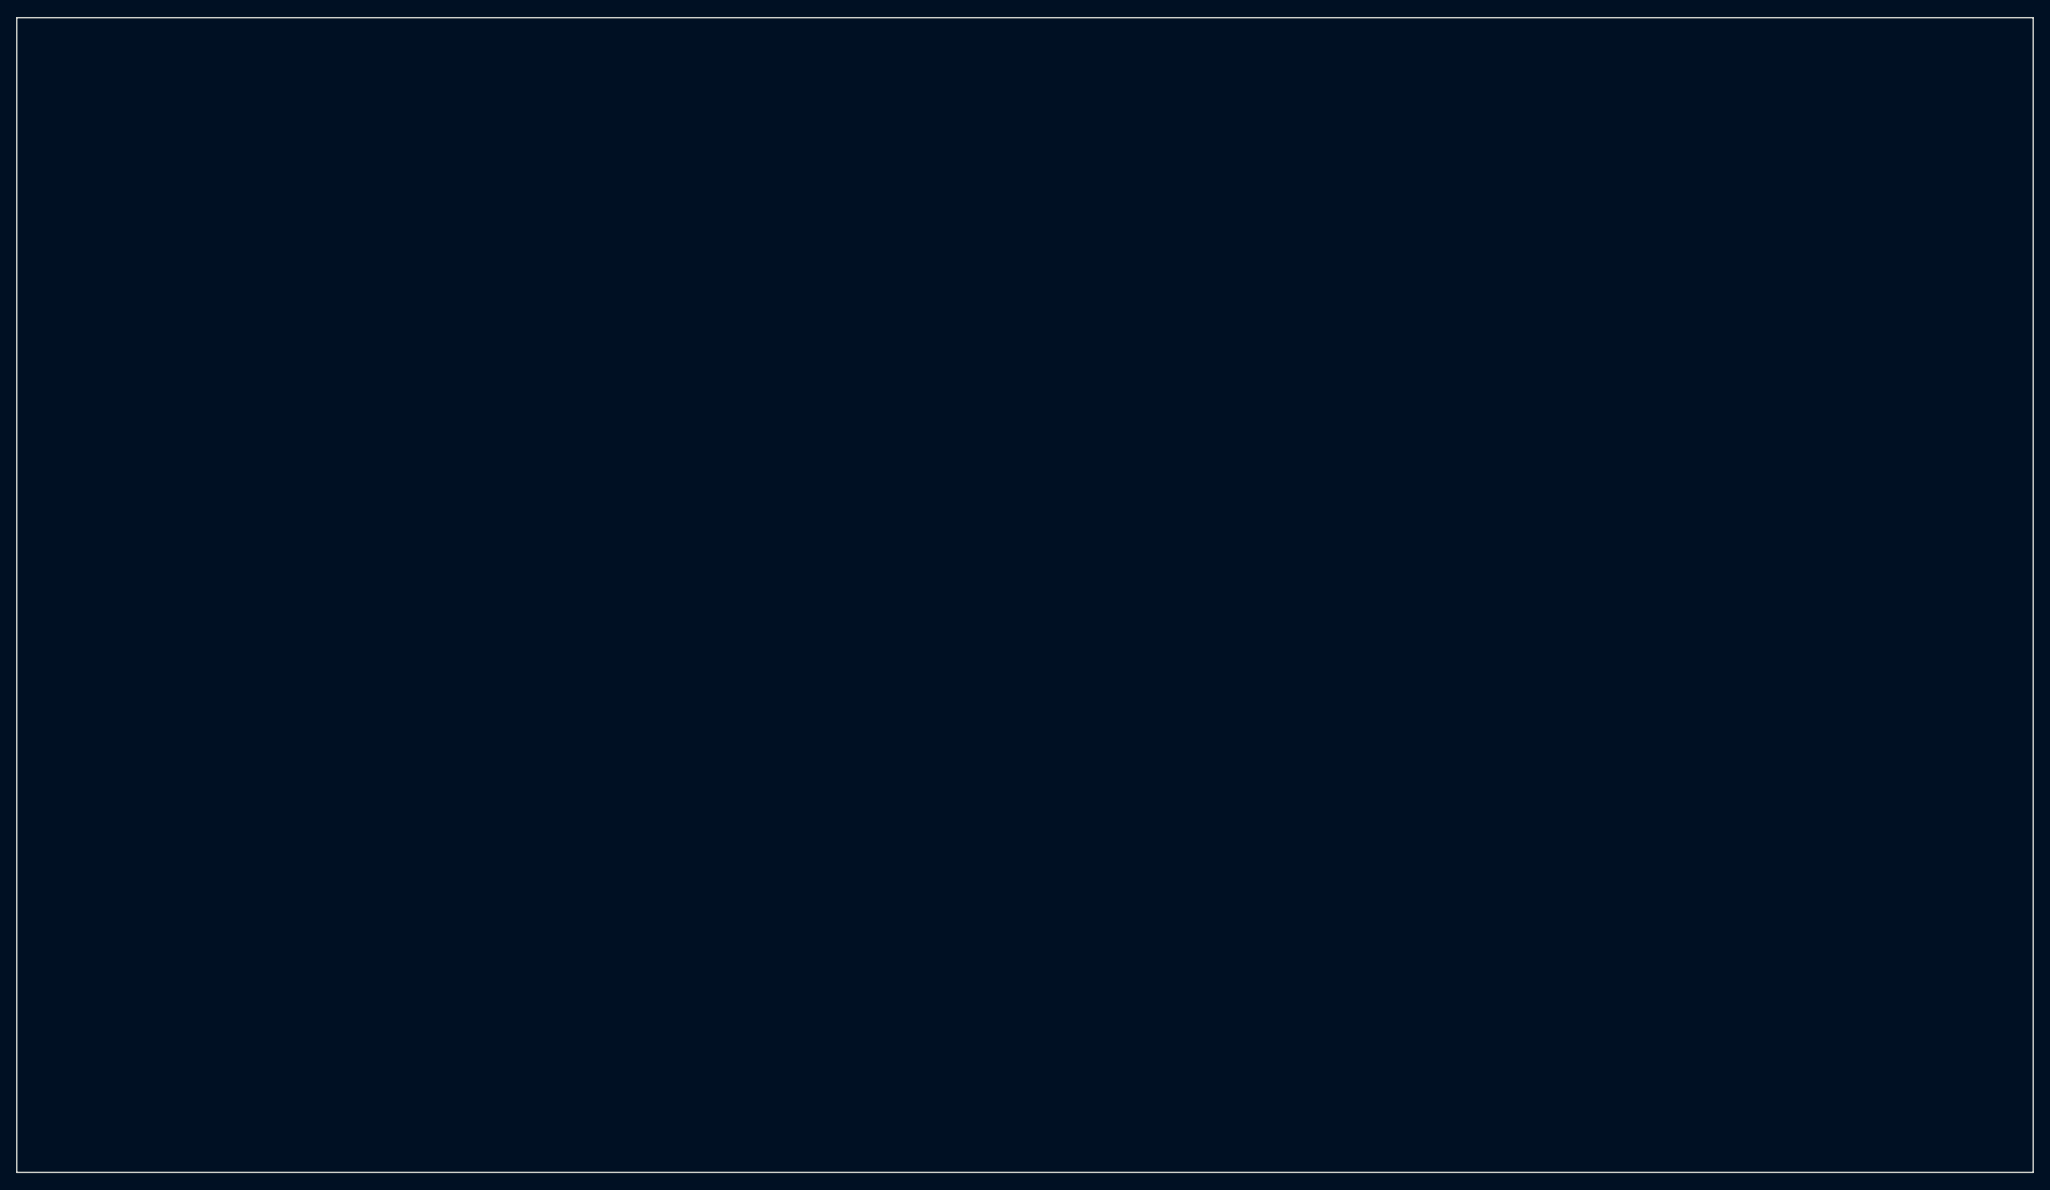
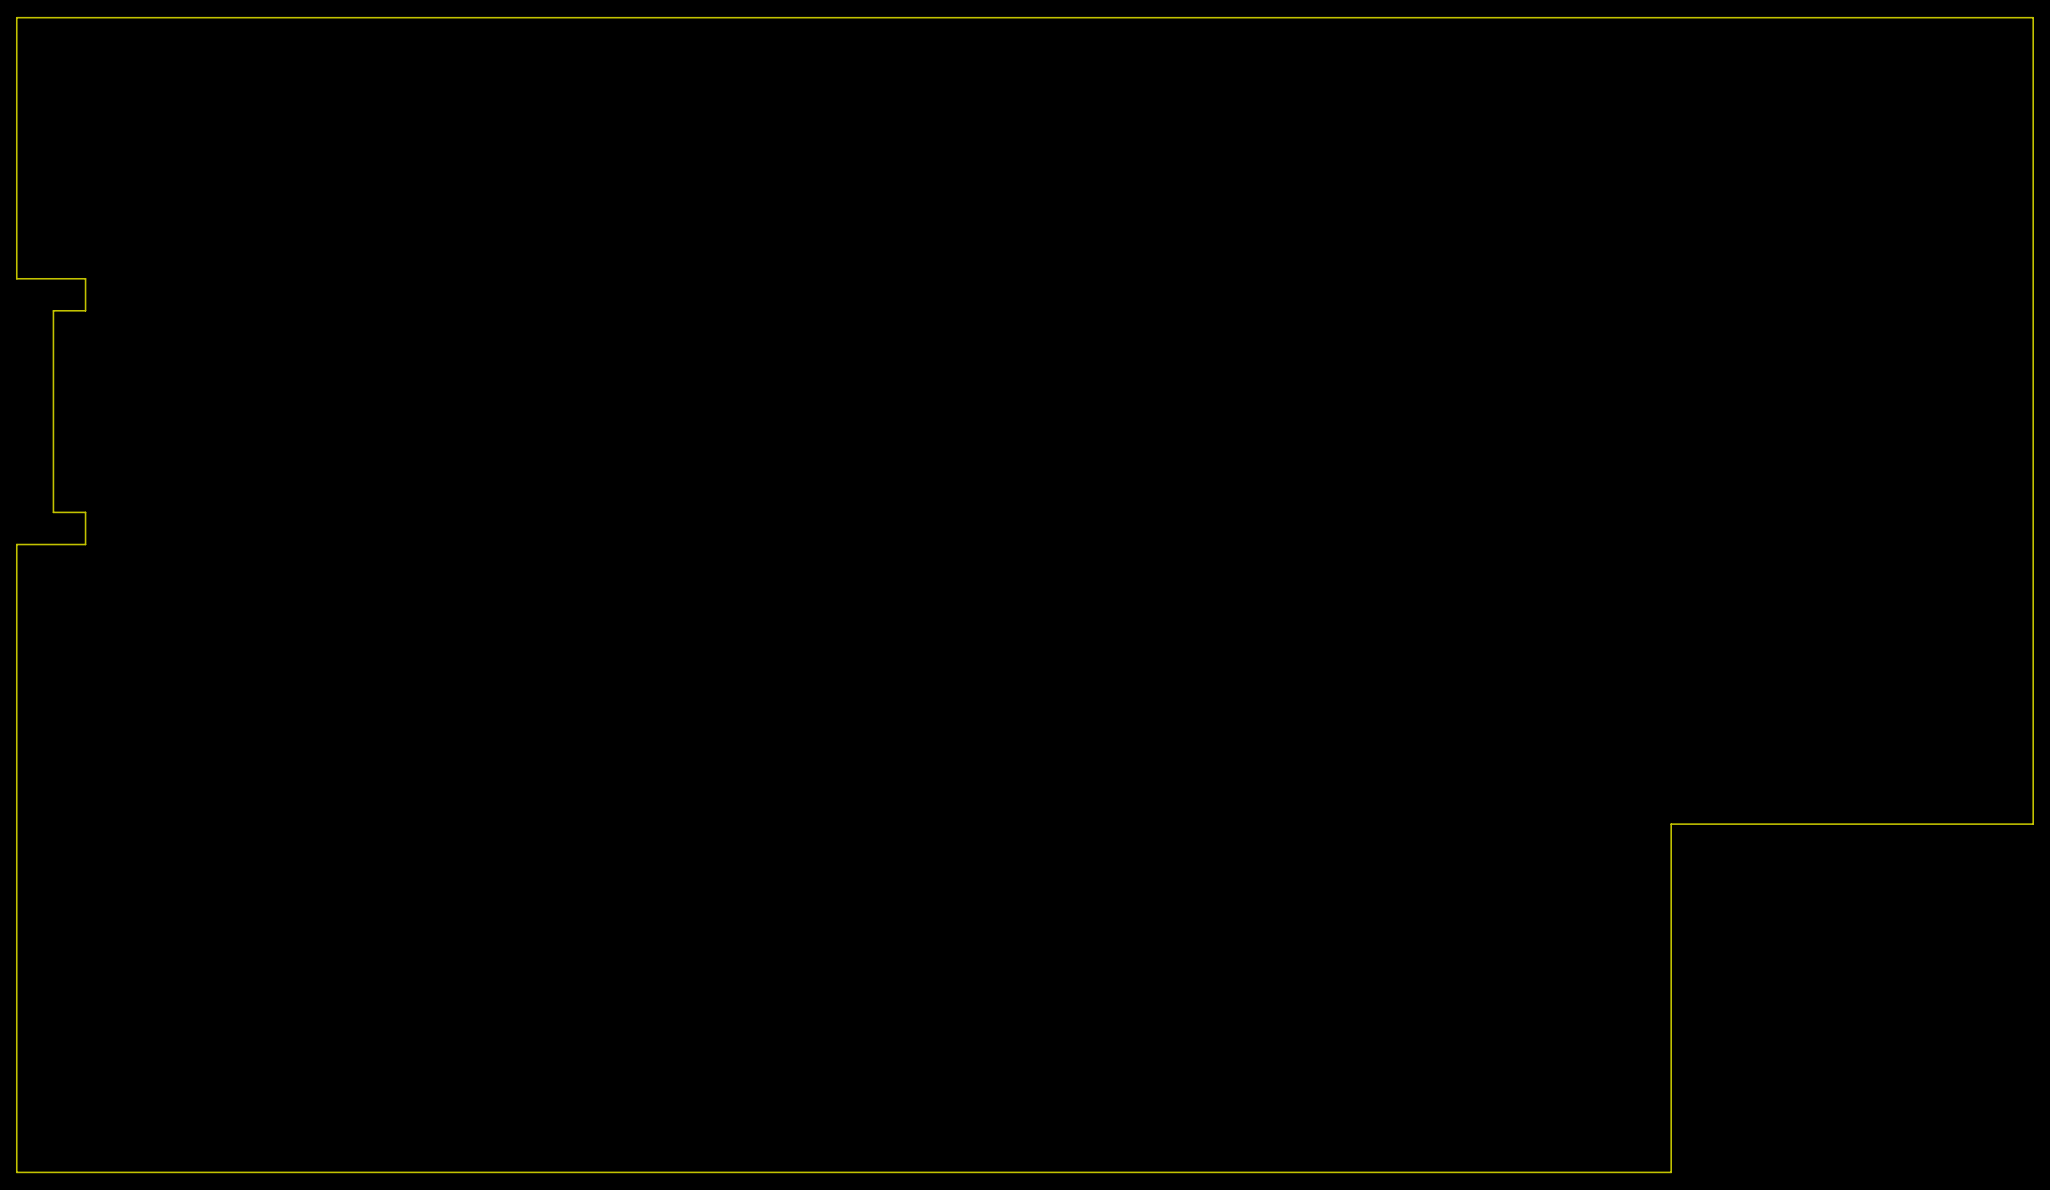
board edge: (16, 278) (16, 544) -> (16, 278) (85, 278) (85, 310) (53, 310) (53, 512) (85, 512) (85, 544) (16, 544)
board edge: (2033, 824) (2033, 1172) (1671, 1172) -> (2033, 824) (1671, 824) (1671, 1172)

